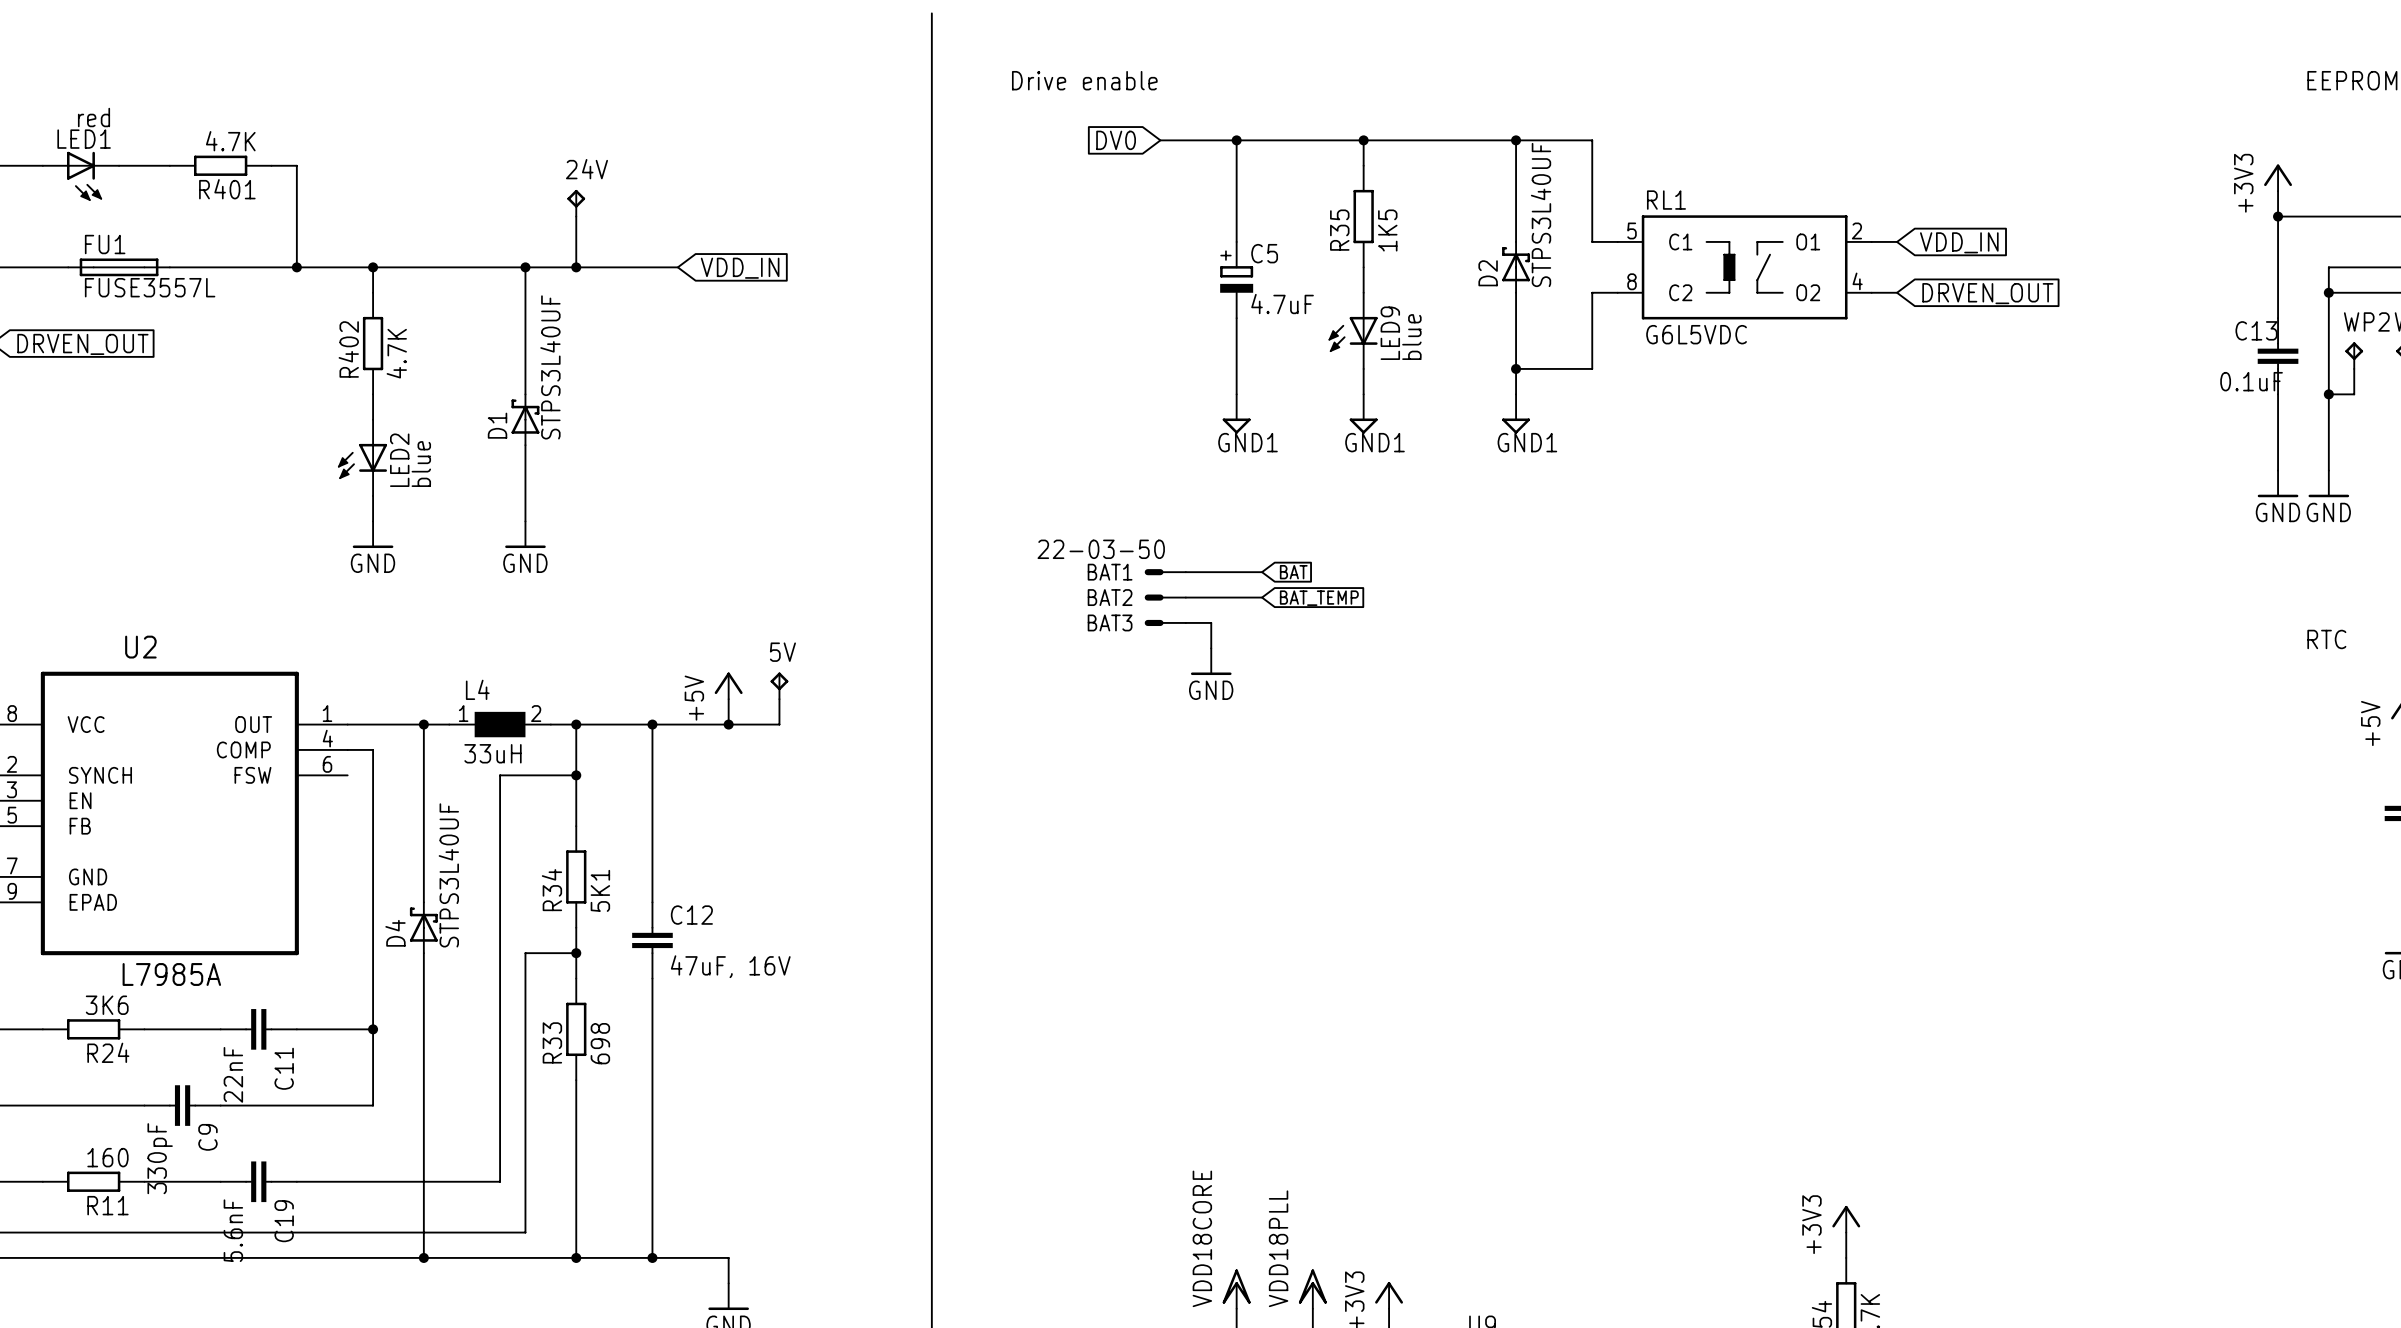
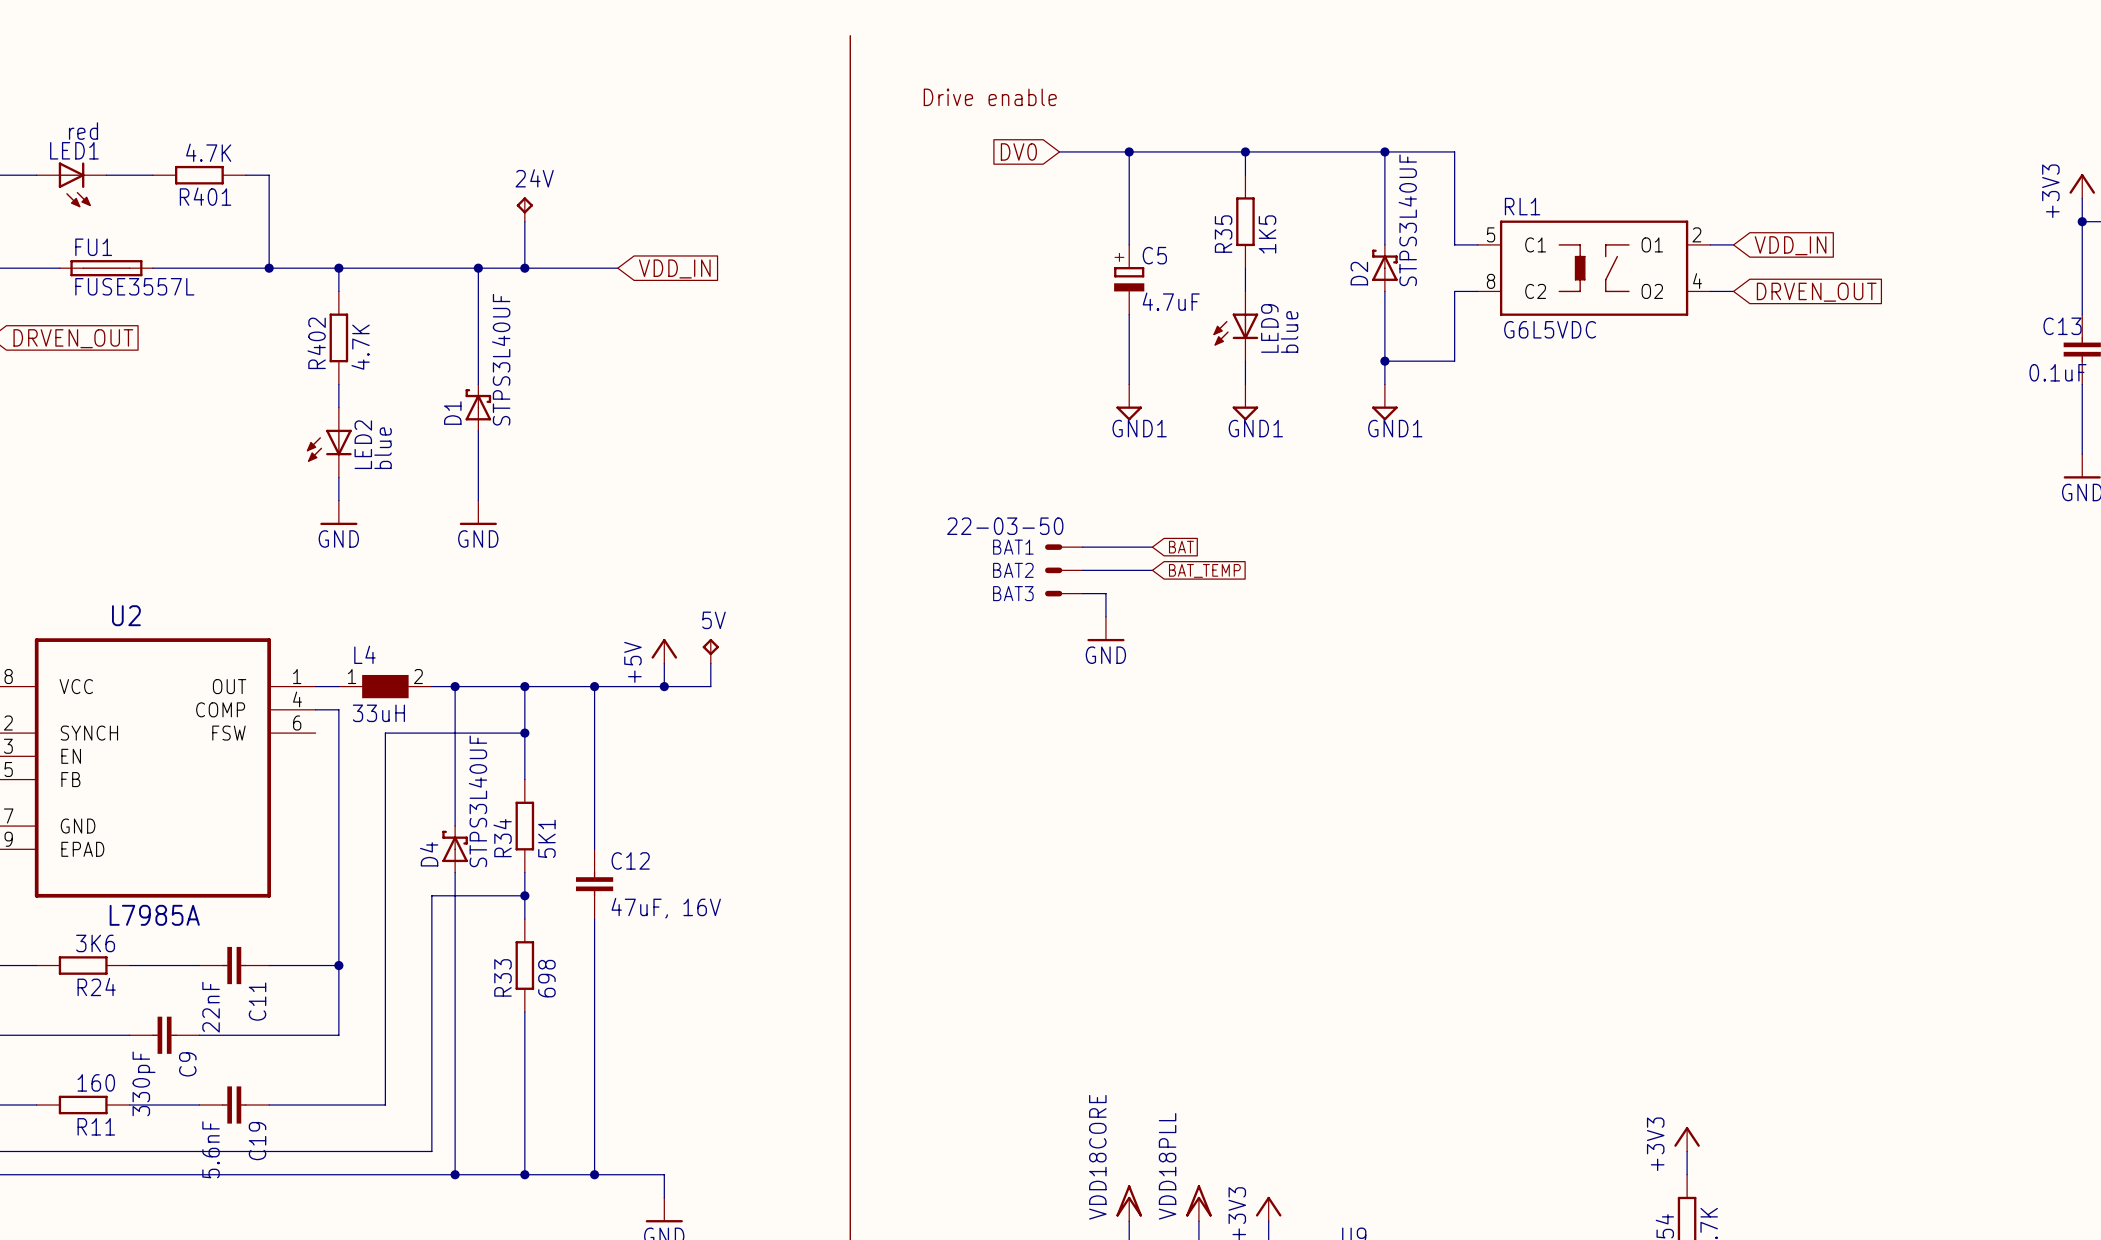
wire: (423, 724) (423, 775) -> (455, 686) (455, 733) (385, 733)
junction: (423, 724) -> none
L4 position: (500, 724) -> (385, 686)
junction: none -> (455, 686)
D4 position: (423, 927) -> (455, 849)
wire: (525, 953) (525, 1232) (474, 1232) -> (478, 895) (431, 895) (431, 1151)
wire: (500, 1181) (423, 1181) (423, 1257) -> (455, 1105) (455, 1174)
junction: (423, 1257) -> none
junction: none -> (455, 1174)

